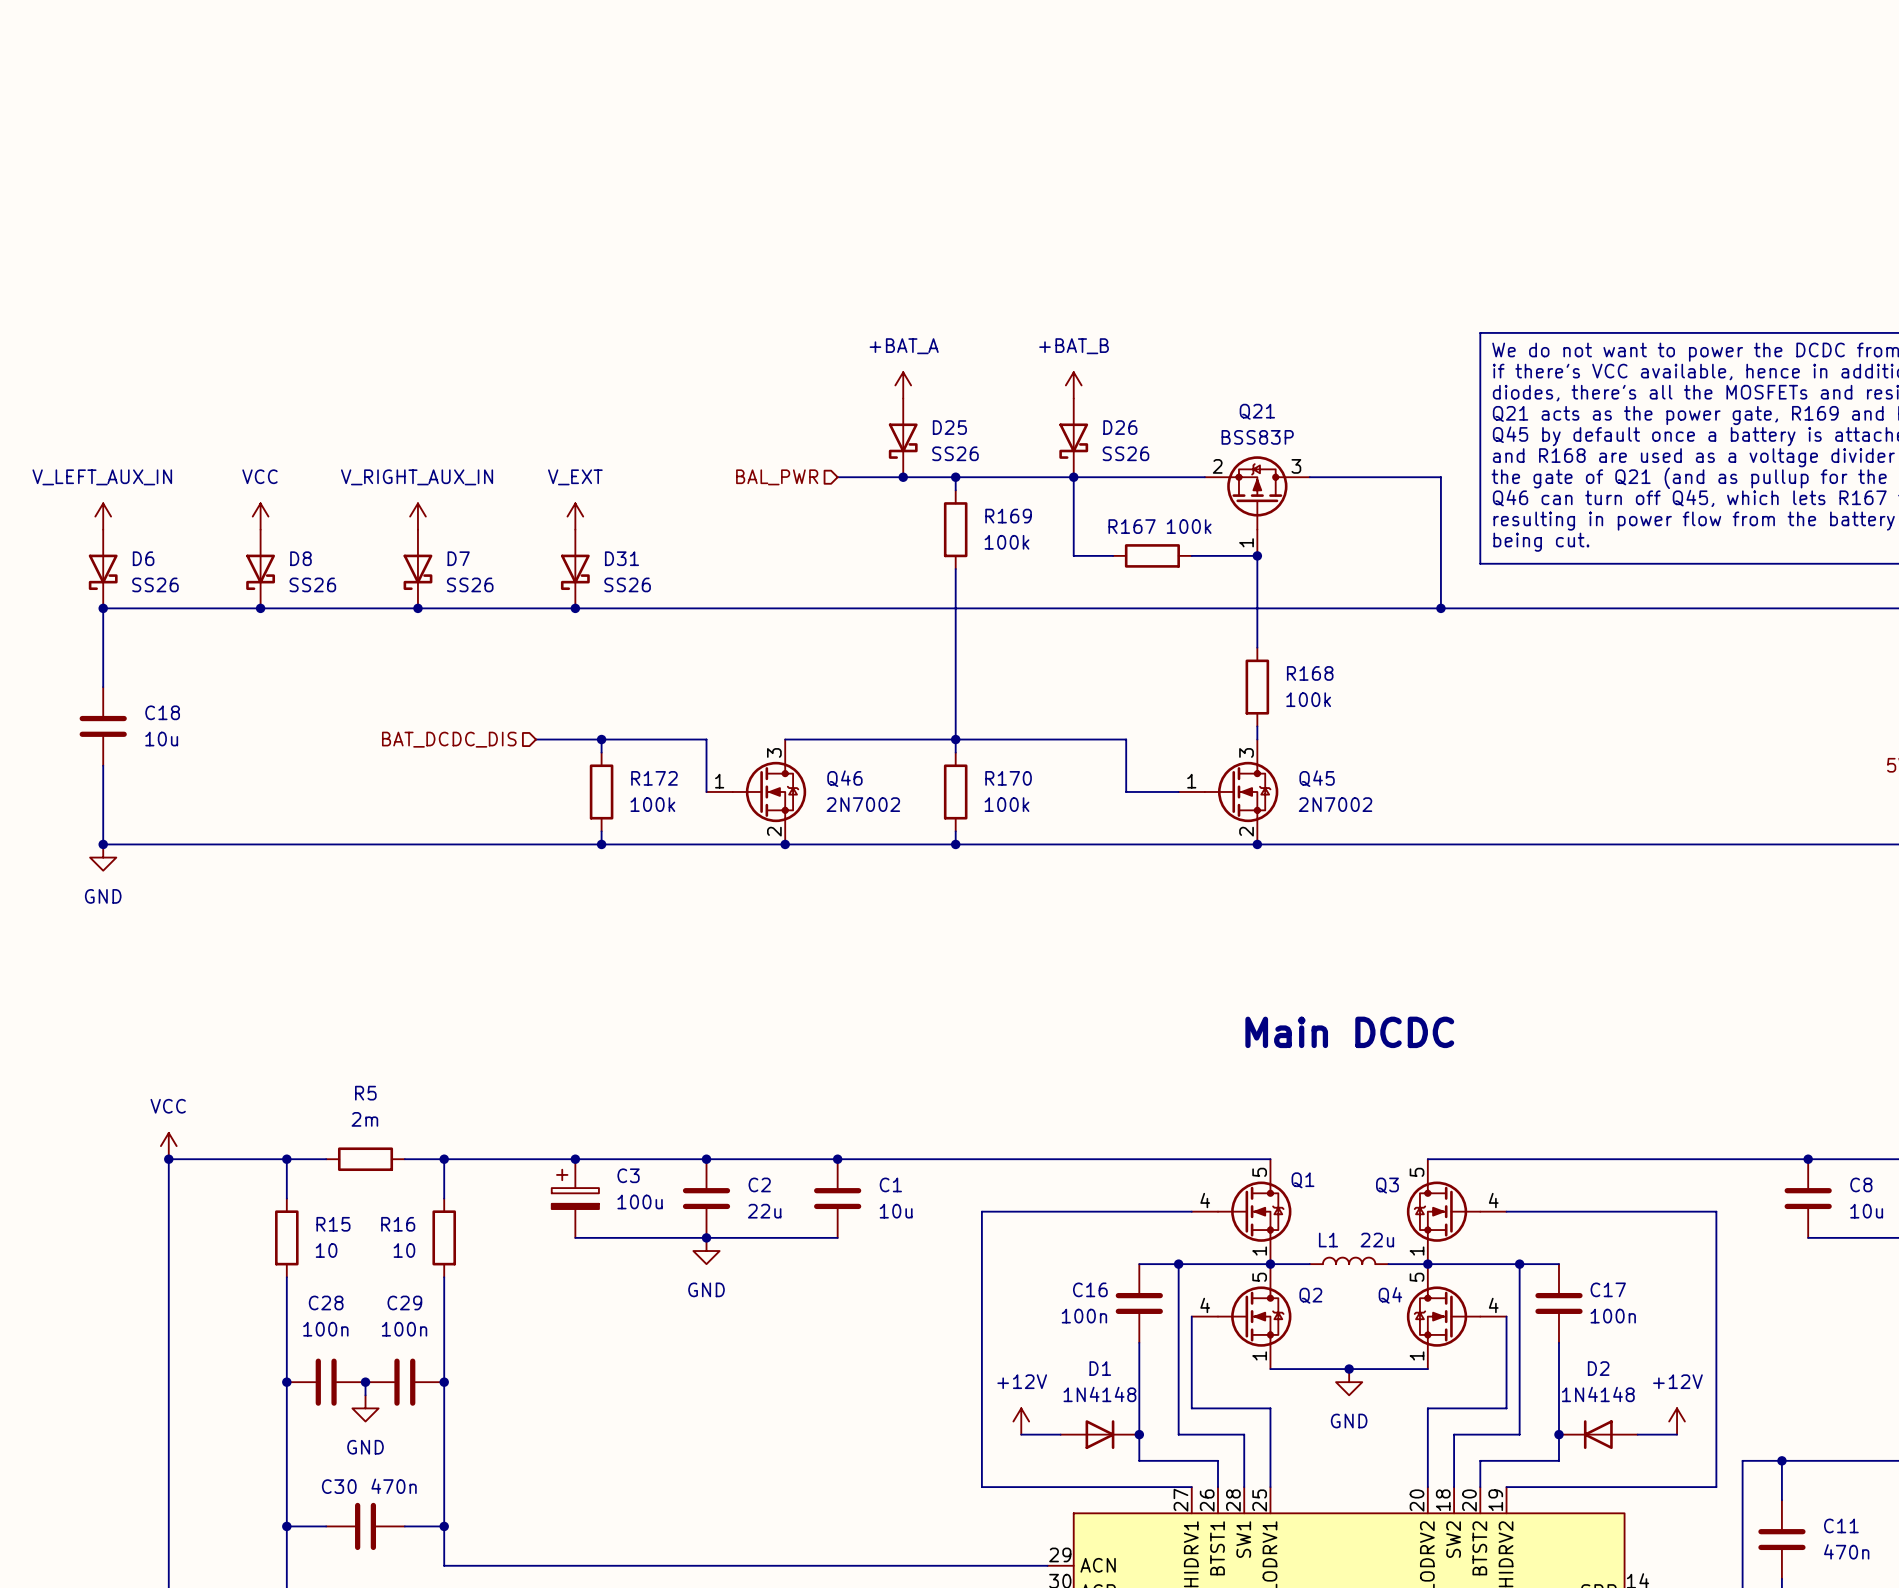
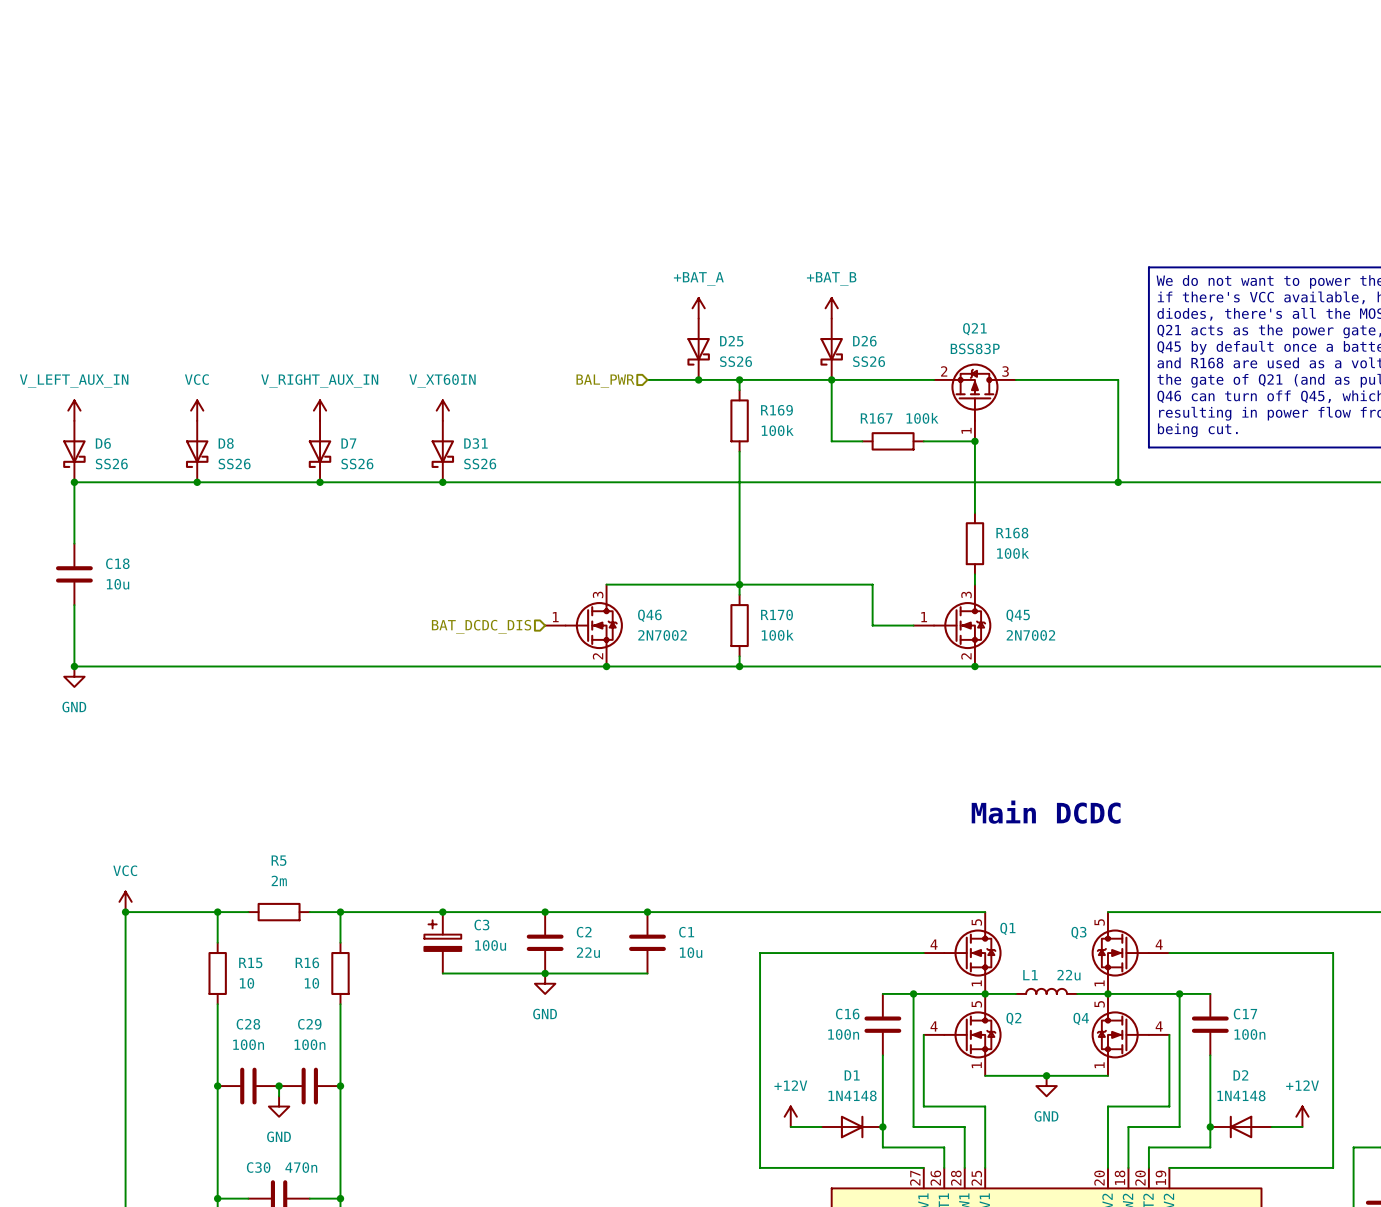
power symbol: V_EXT (575, 516) -> V_XT60IN (442, 410)
hierarchical label position: BAT_DCDC_DIS (449, 739) -> BAT_DCDC_DIS (481, 626)
wire: (536, 739) (706, 739) (706, 791) -> none
wire: (601, 739) (601, 752) -> none
junction: (601, 739) -> none
R172: 100k (601, 791) -> none
wire: (601, 831) (601, 844) -> none
junction: (601, 844) -> none

